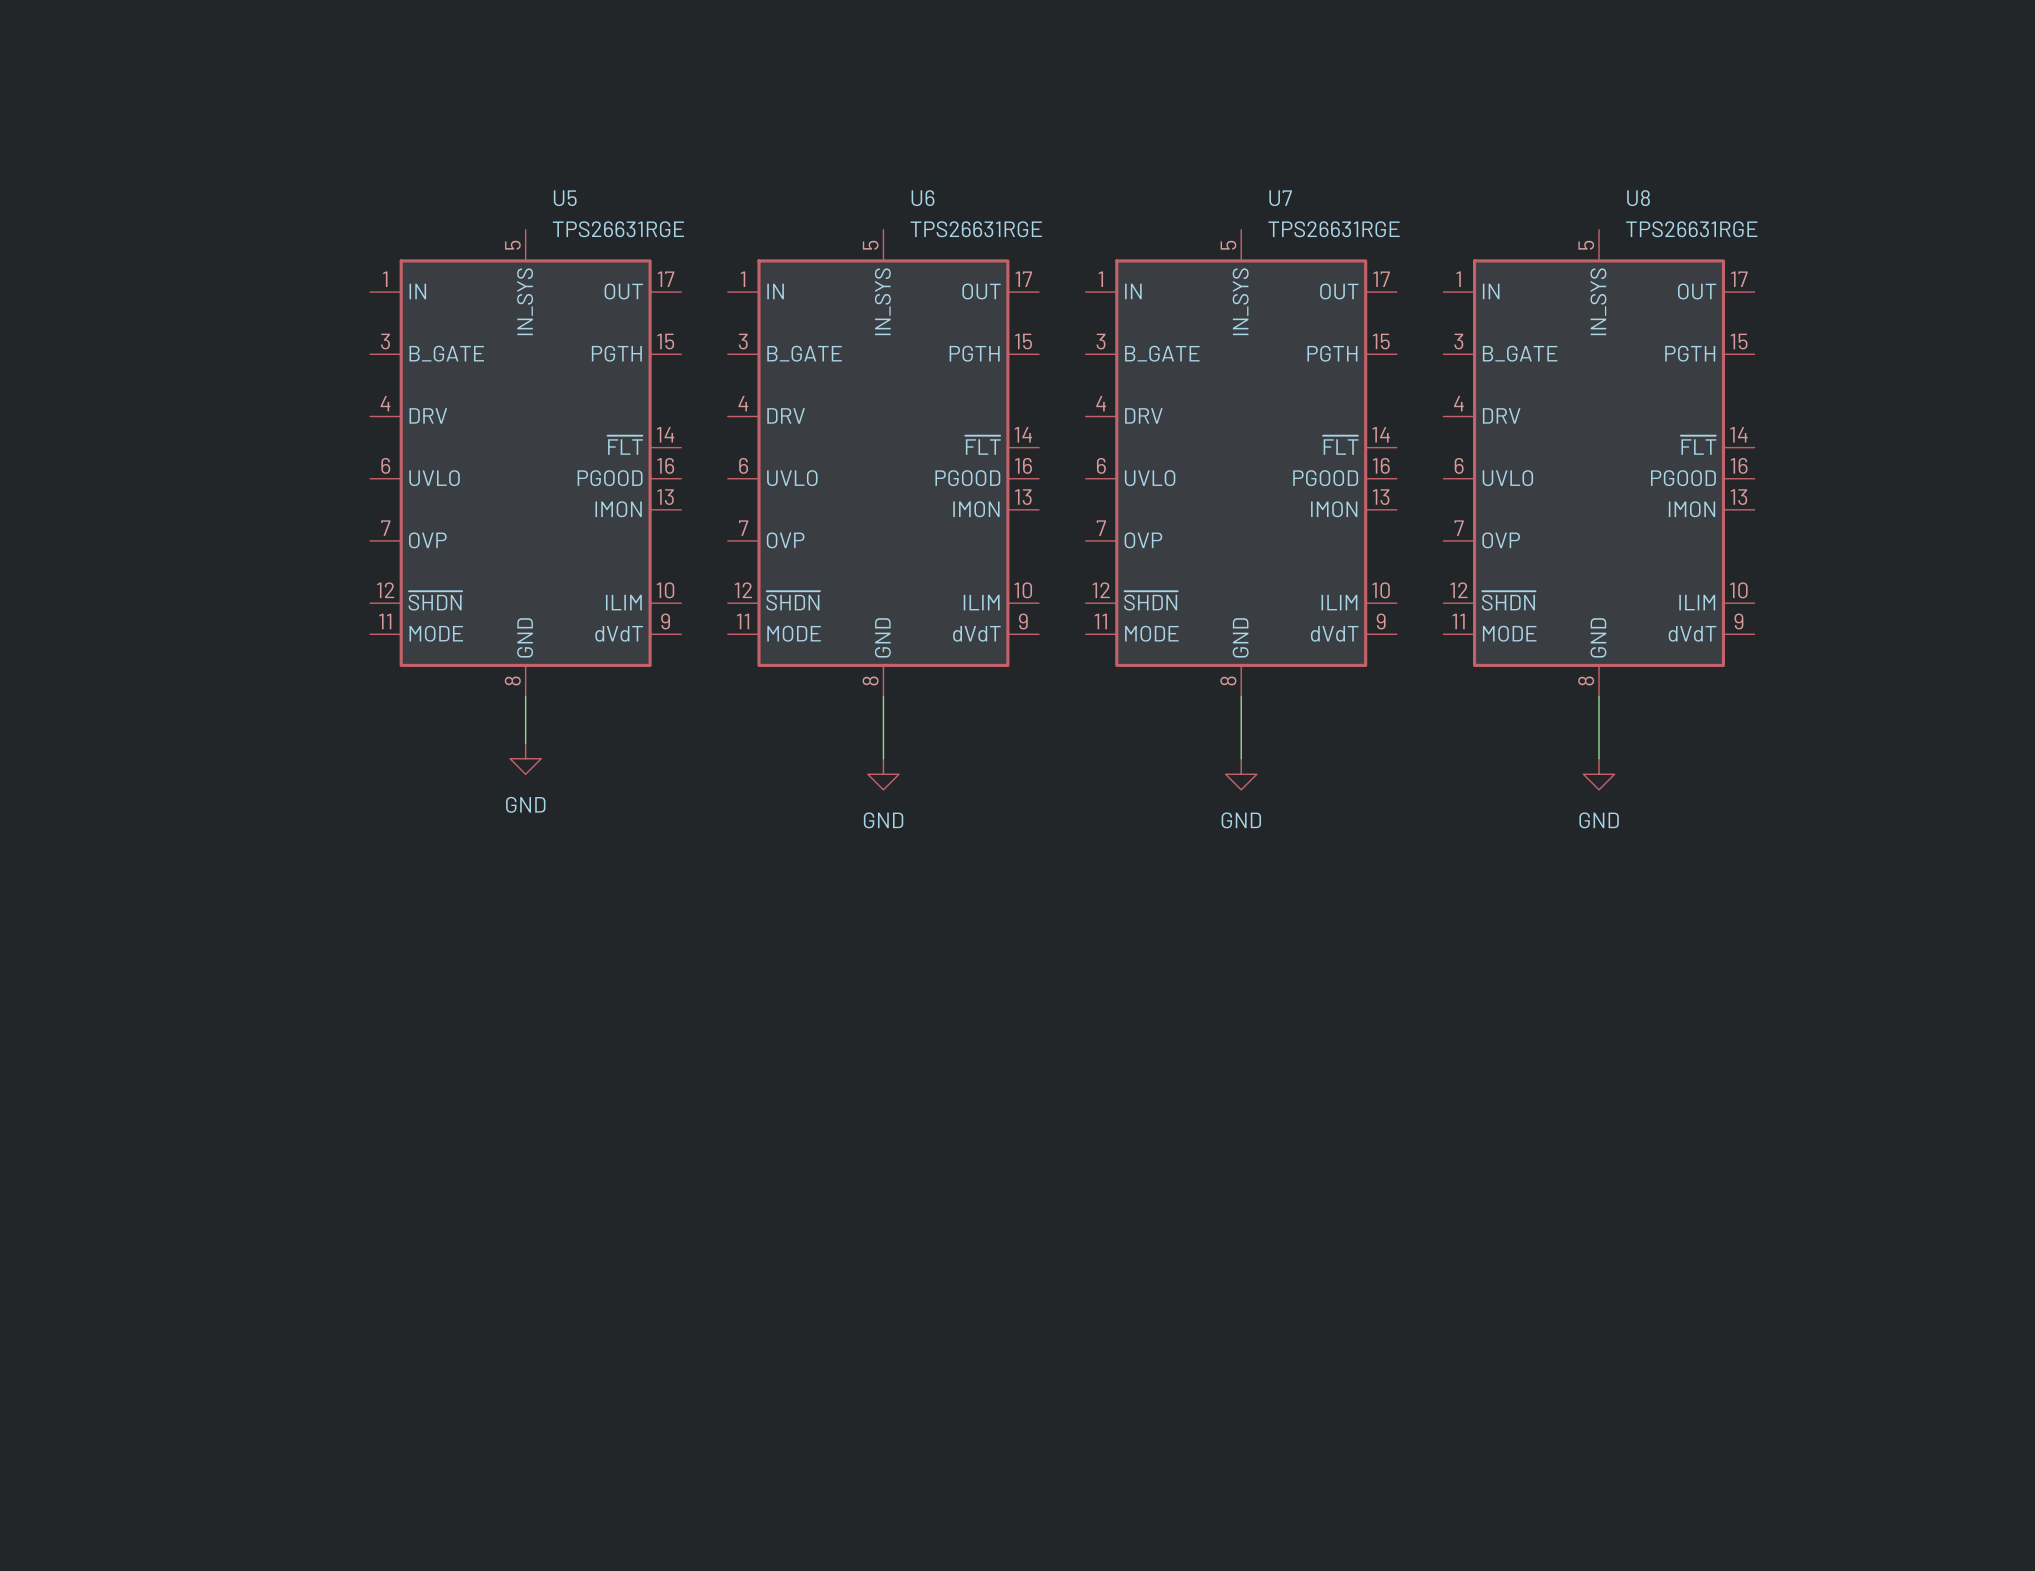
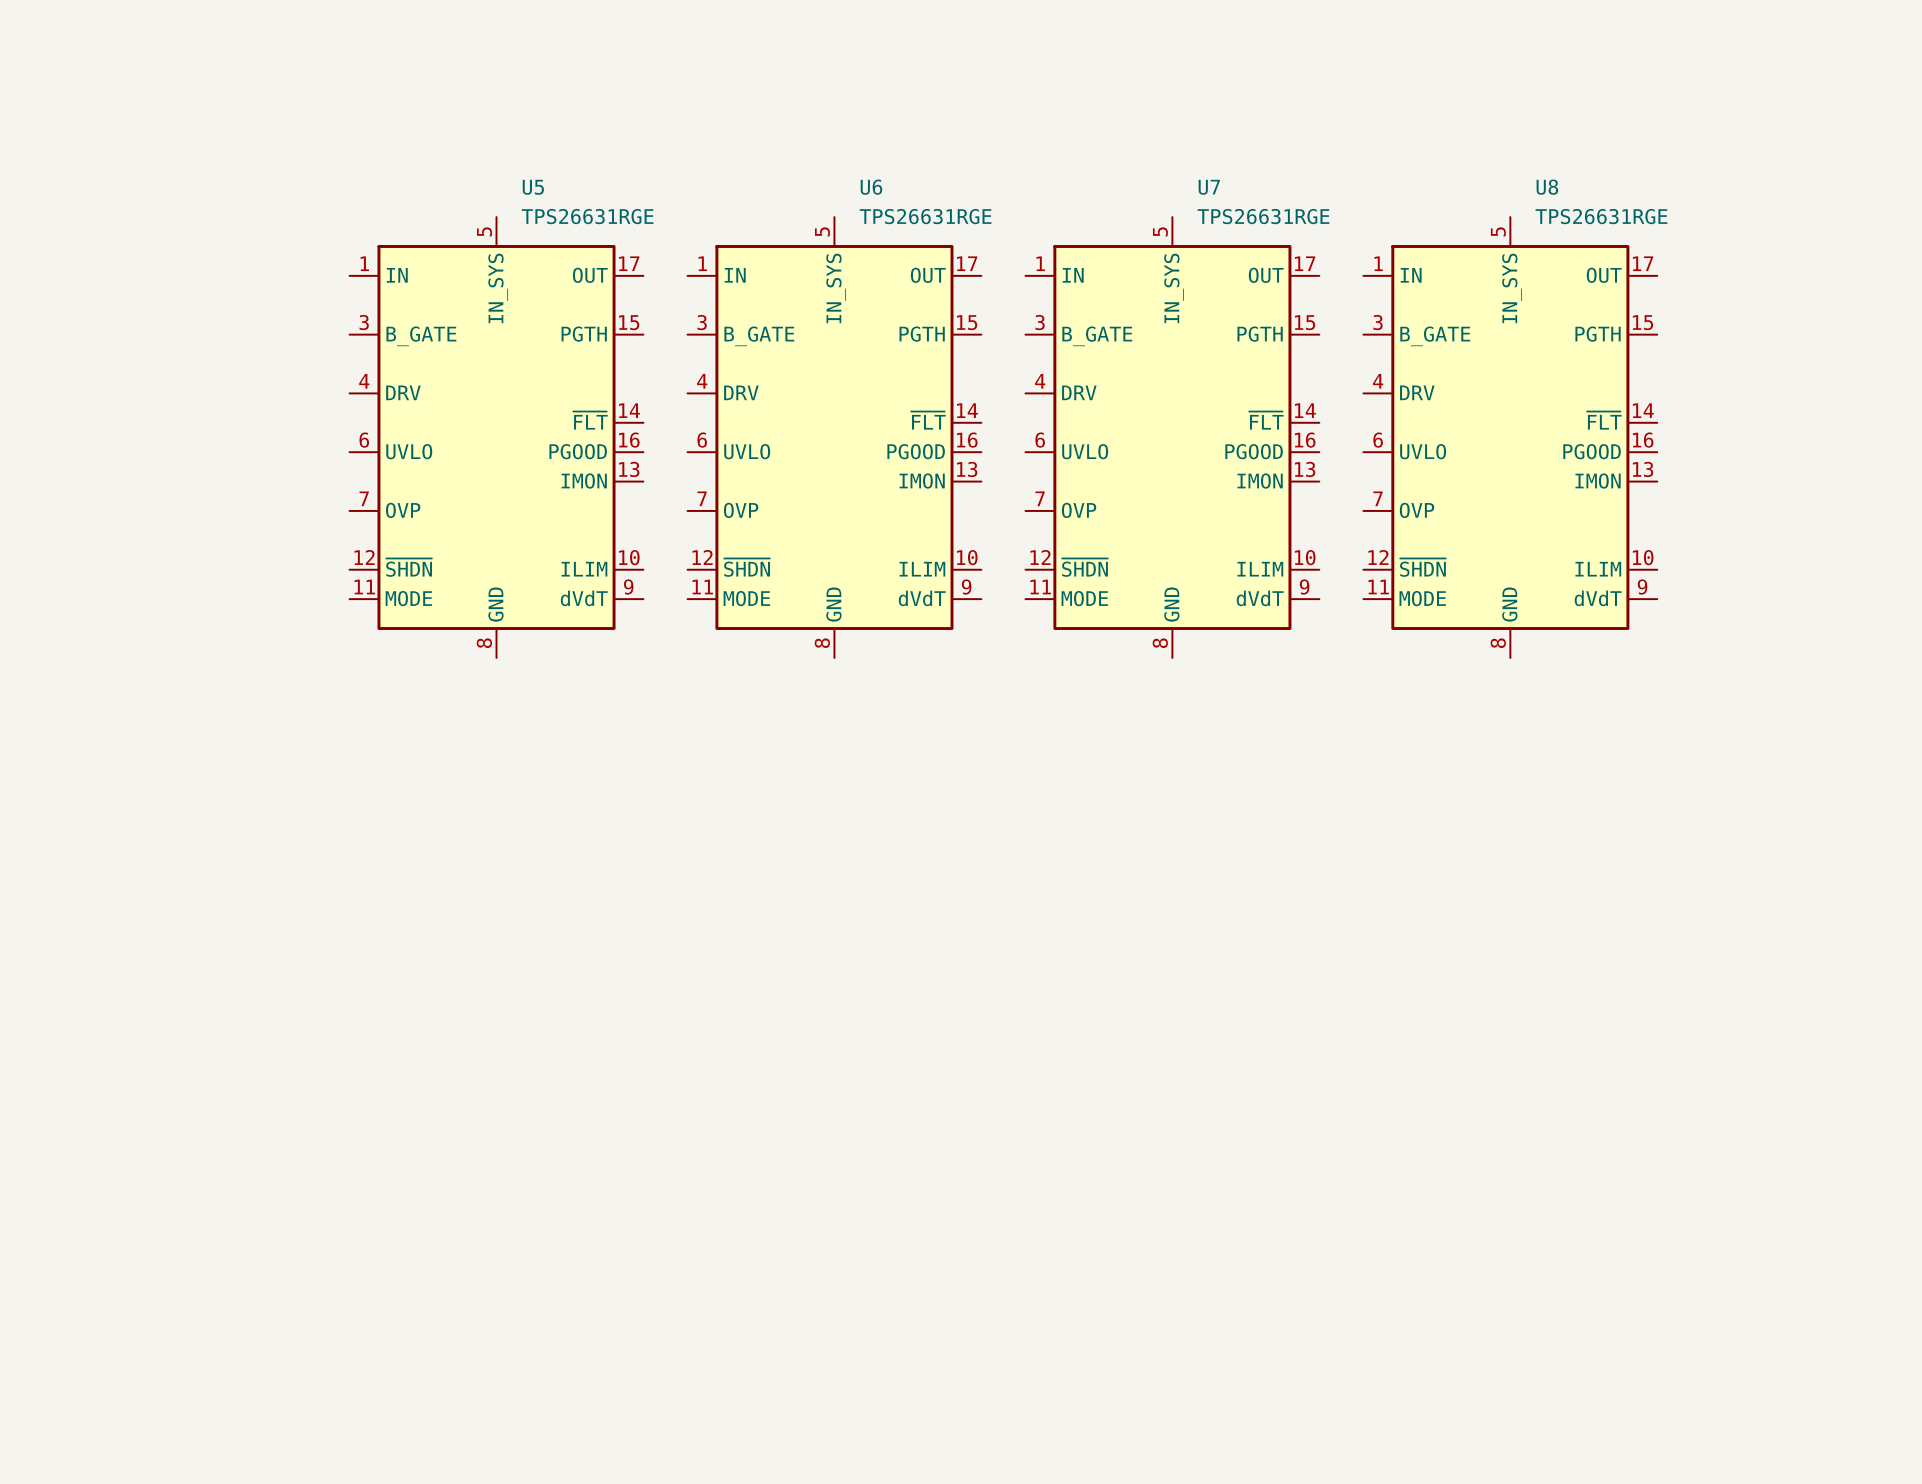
wire: (525, 696) (525, 743) -> none
wire: (883, 696) (883, 758) -> none
wire: (1241, 696) (1241, 758) -> none
wire: (1599, 696) (1599, 758) -> none
power symbol: GND (525, 758) -> none
power symbol: GND (883, 774) -> none
power symbol: GND (1241, 774) -> none
power symbol: GND (1599, 774) -> none

